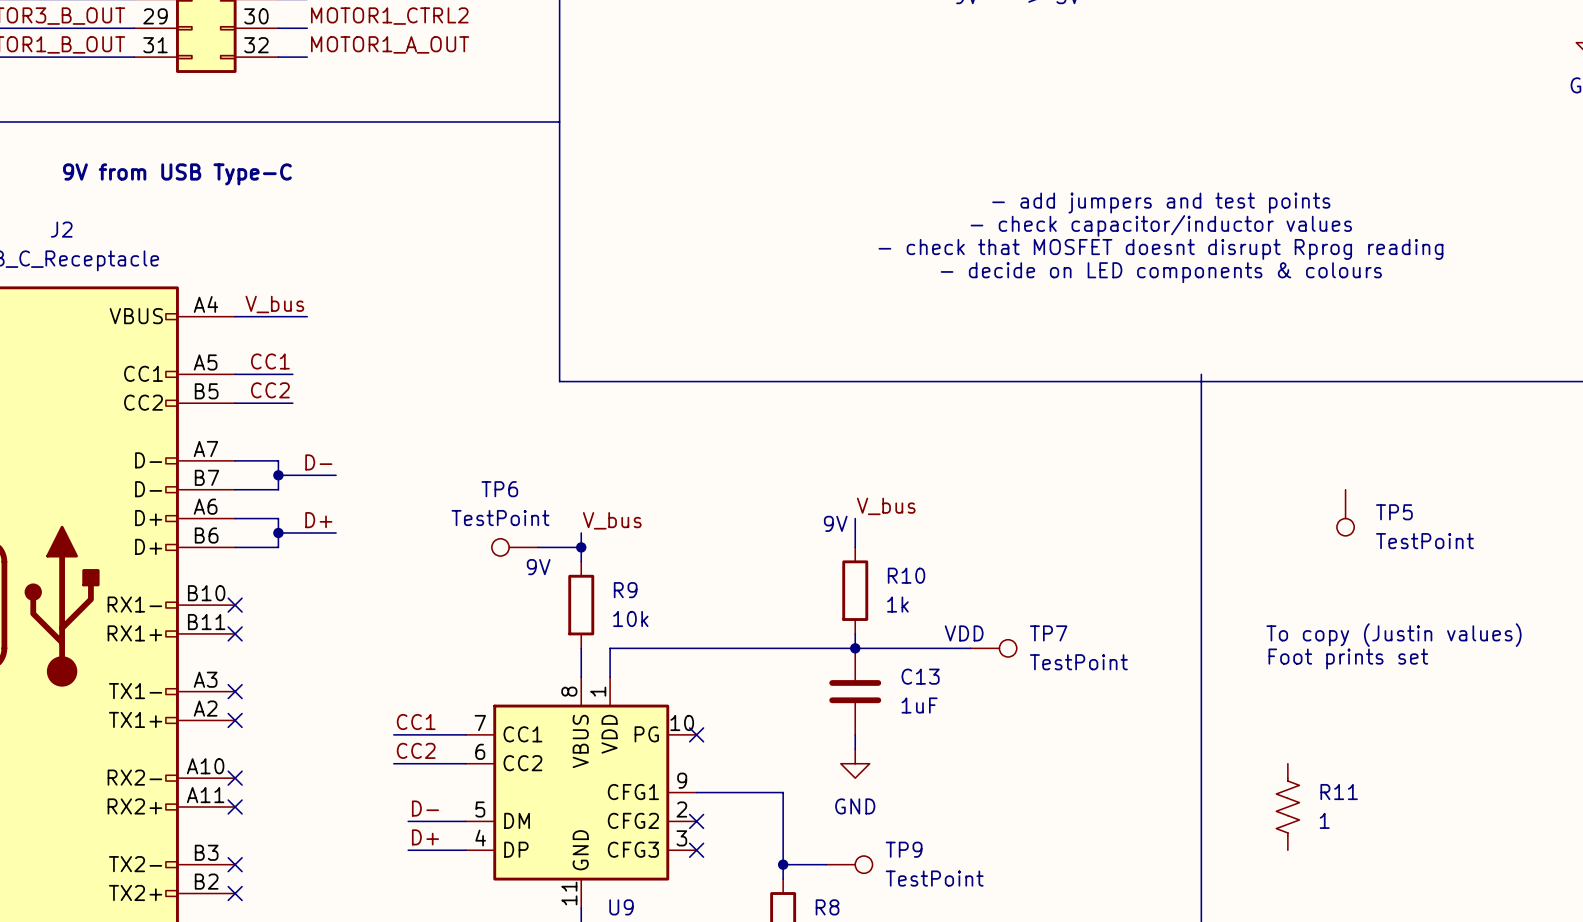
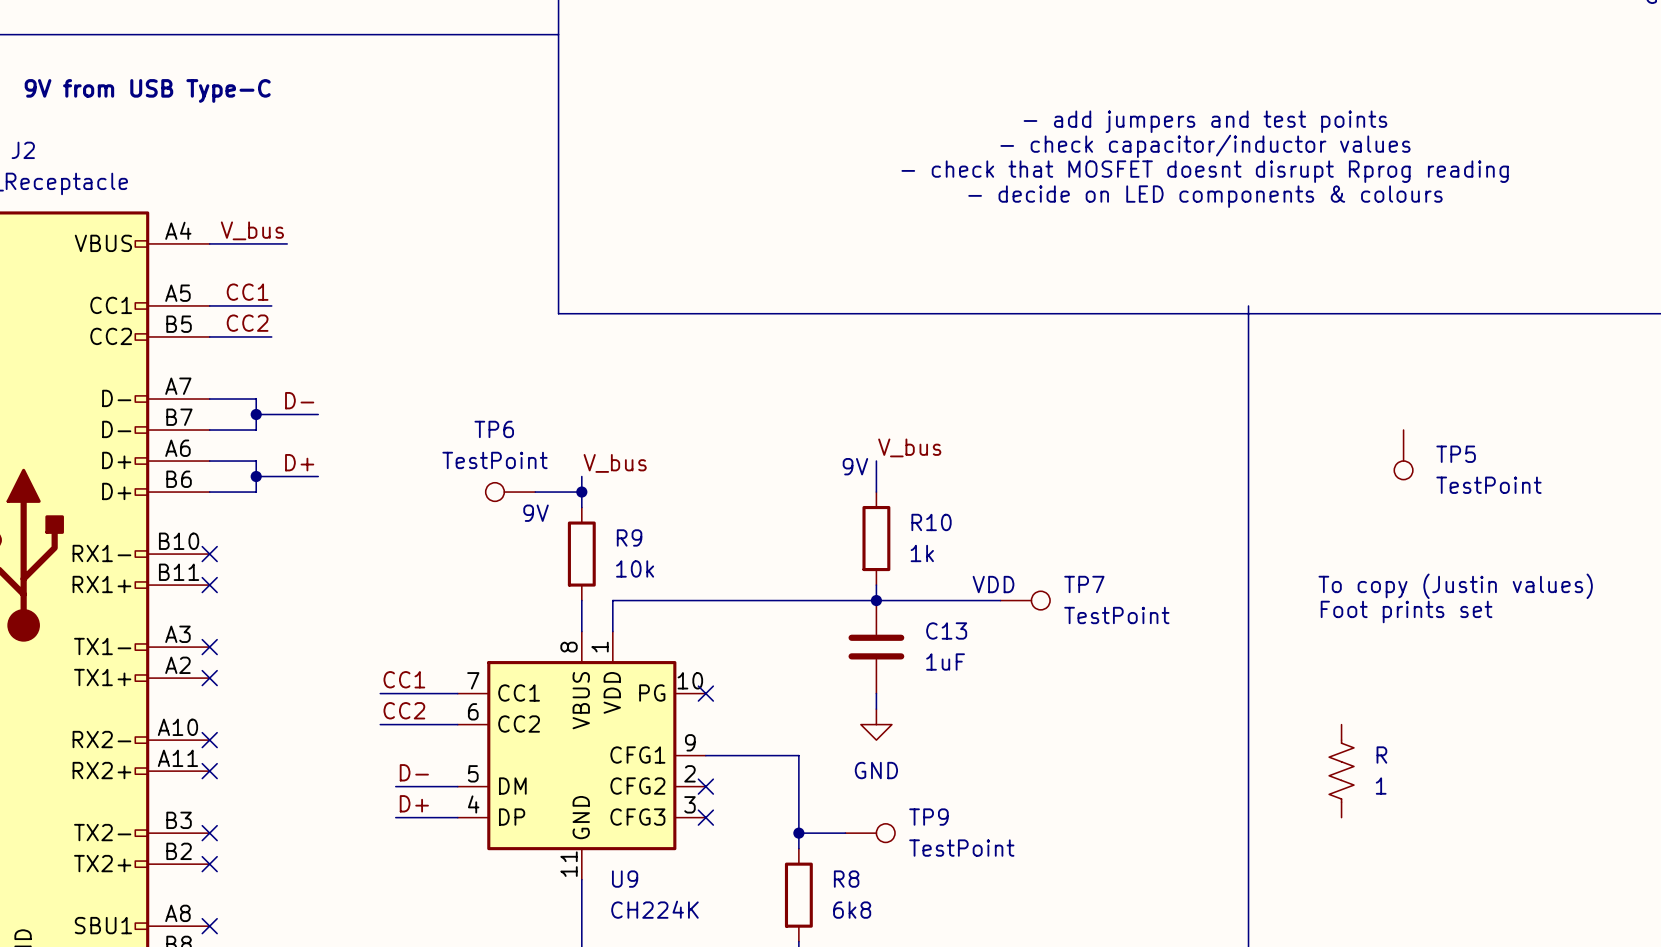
R11 name: R11 (1339, 792) -> R (1381, 755)

